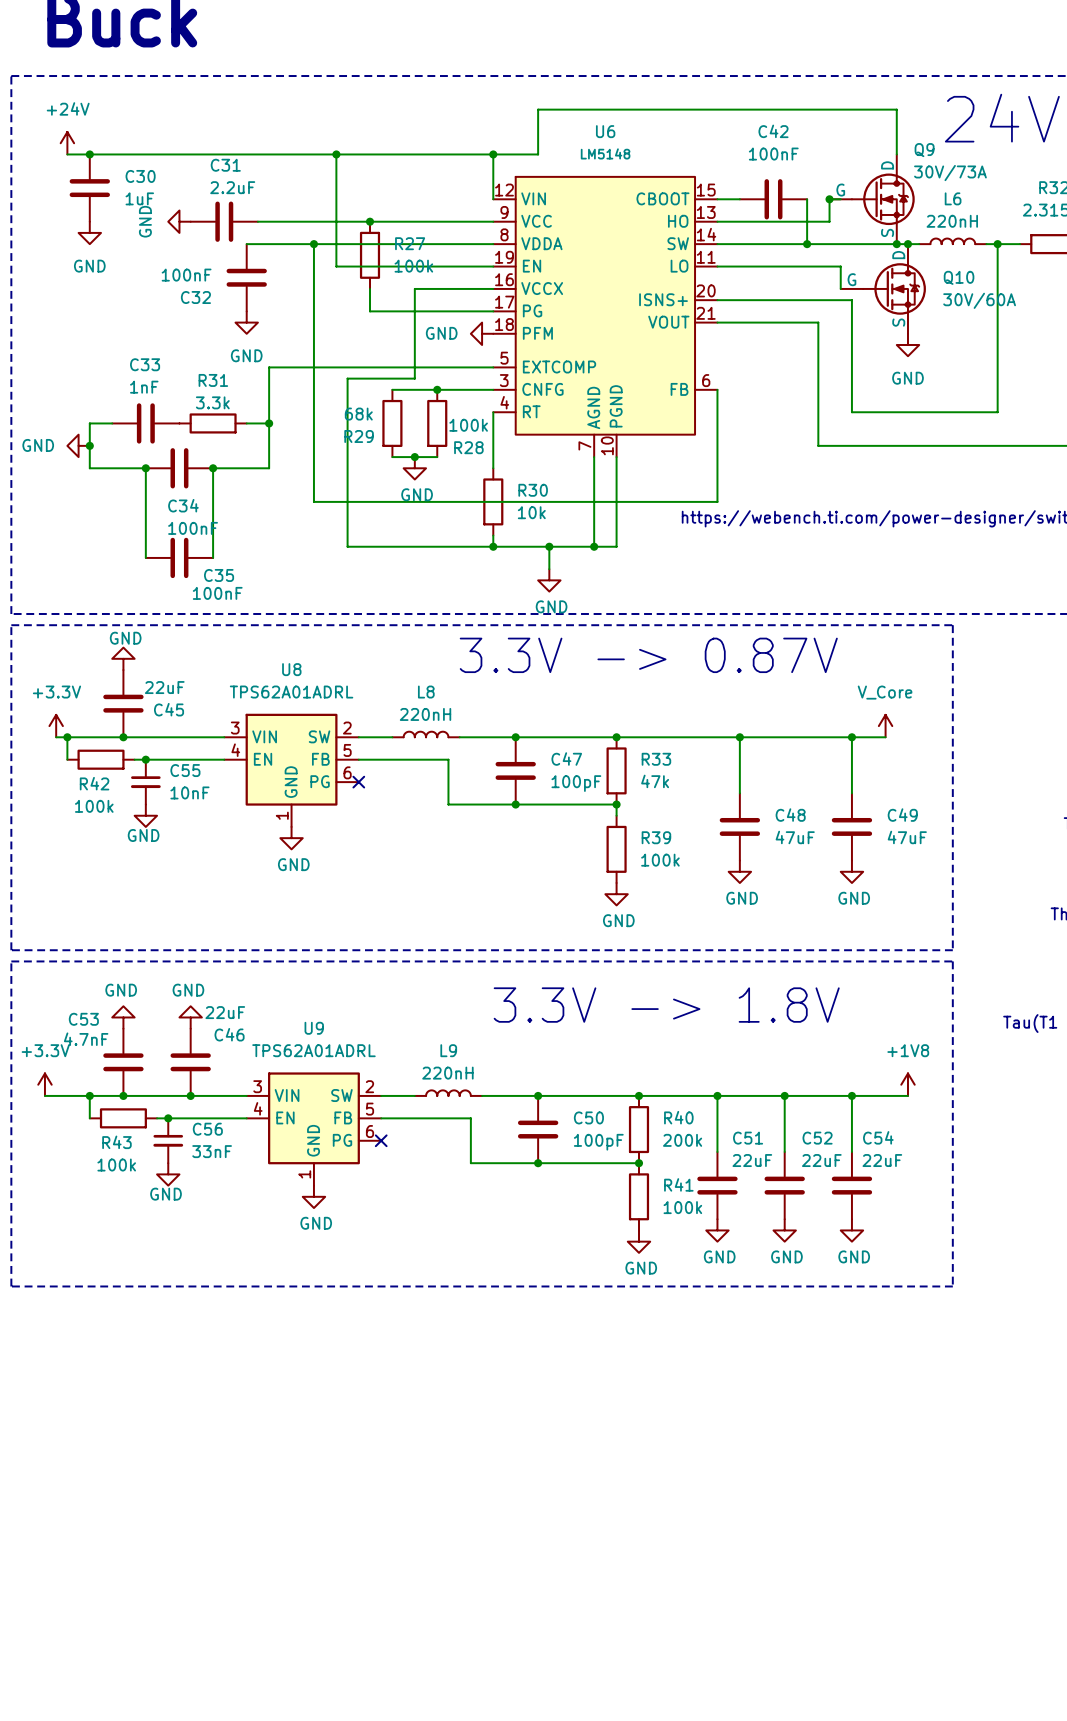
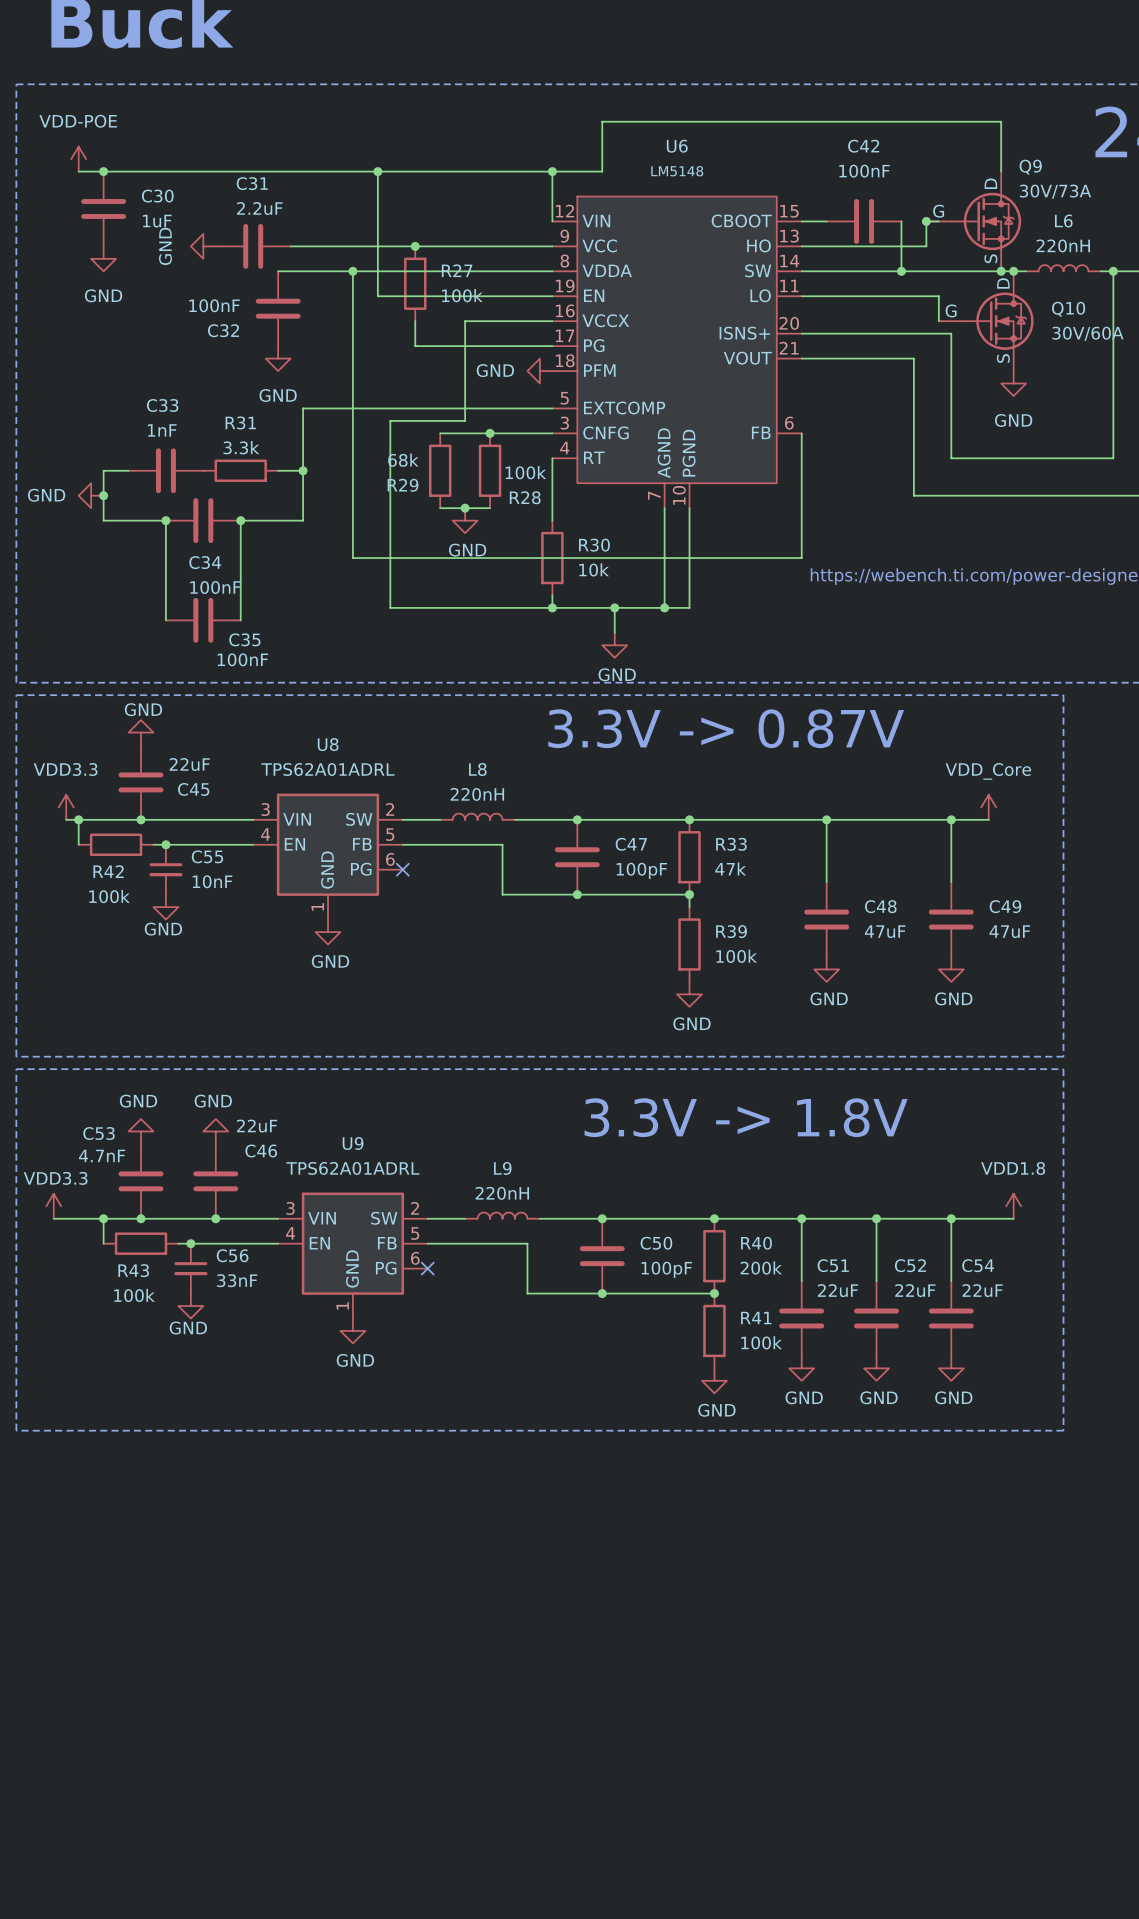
power symbol: +24V (67, 143) -> VDD-POE (78, 159)
power symbol: +3.3V (56, 726) -> VDD3.3 (66, 807)
power symbol: V_Core (885, 726) -> VDD_Core (988, 807)
power symbol: +3.3V (44, 1084) -> VDD3.3 (53, 1206)
power symbol: +1V8 (907, 1084) -> VDD1.8 (1013, 1206)

